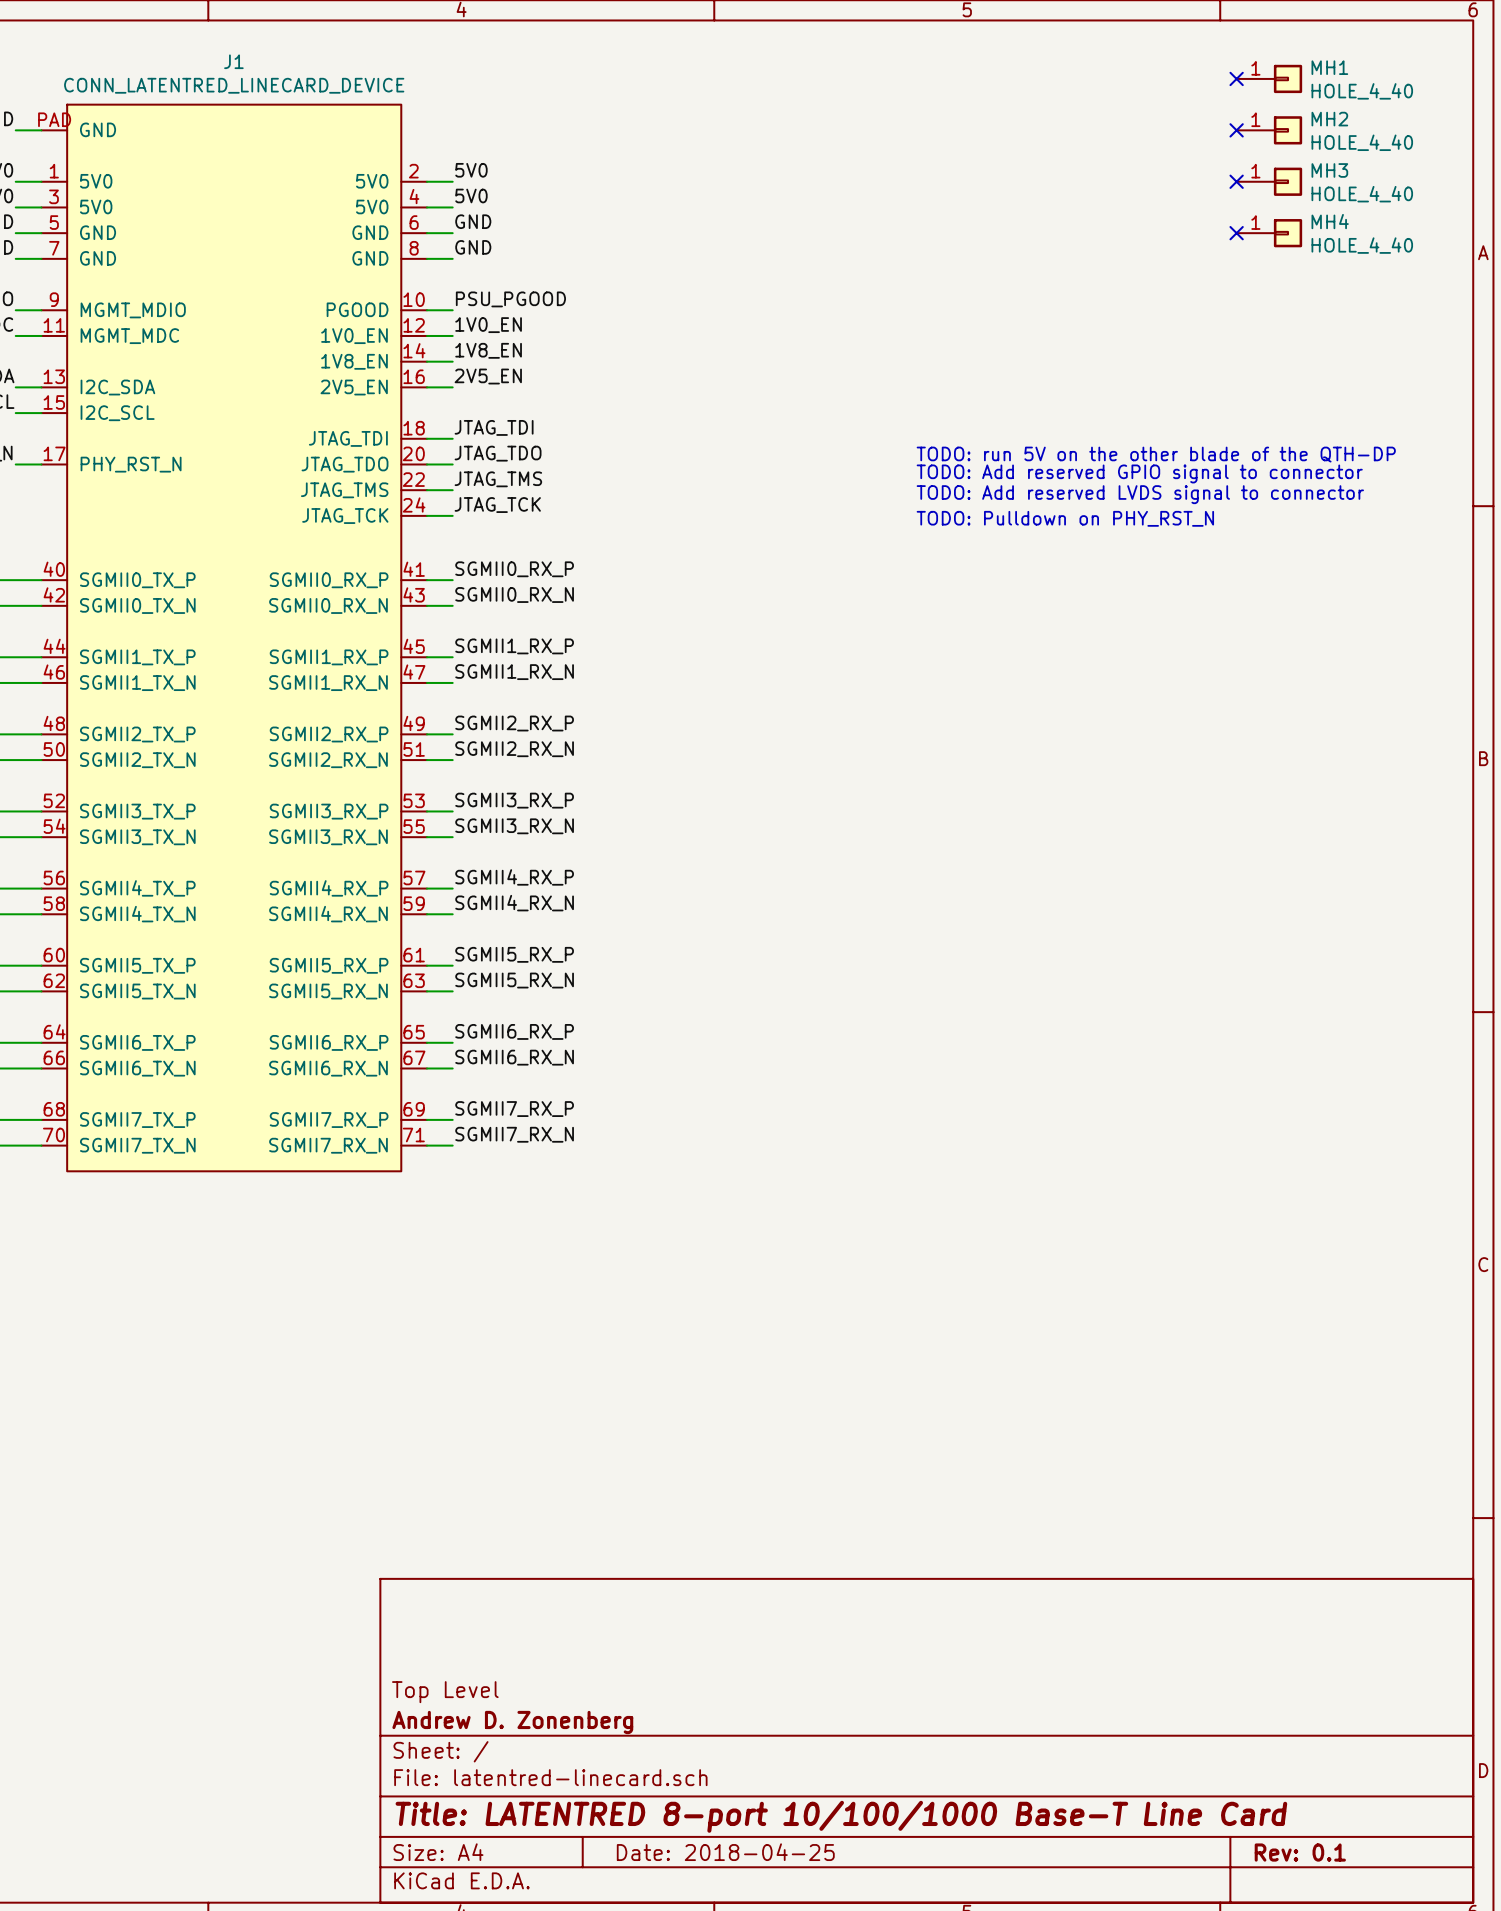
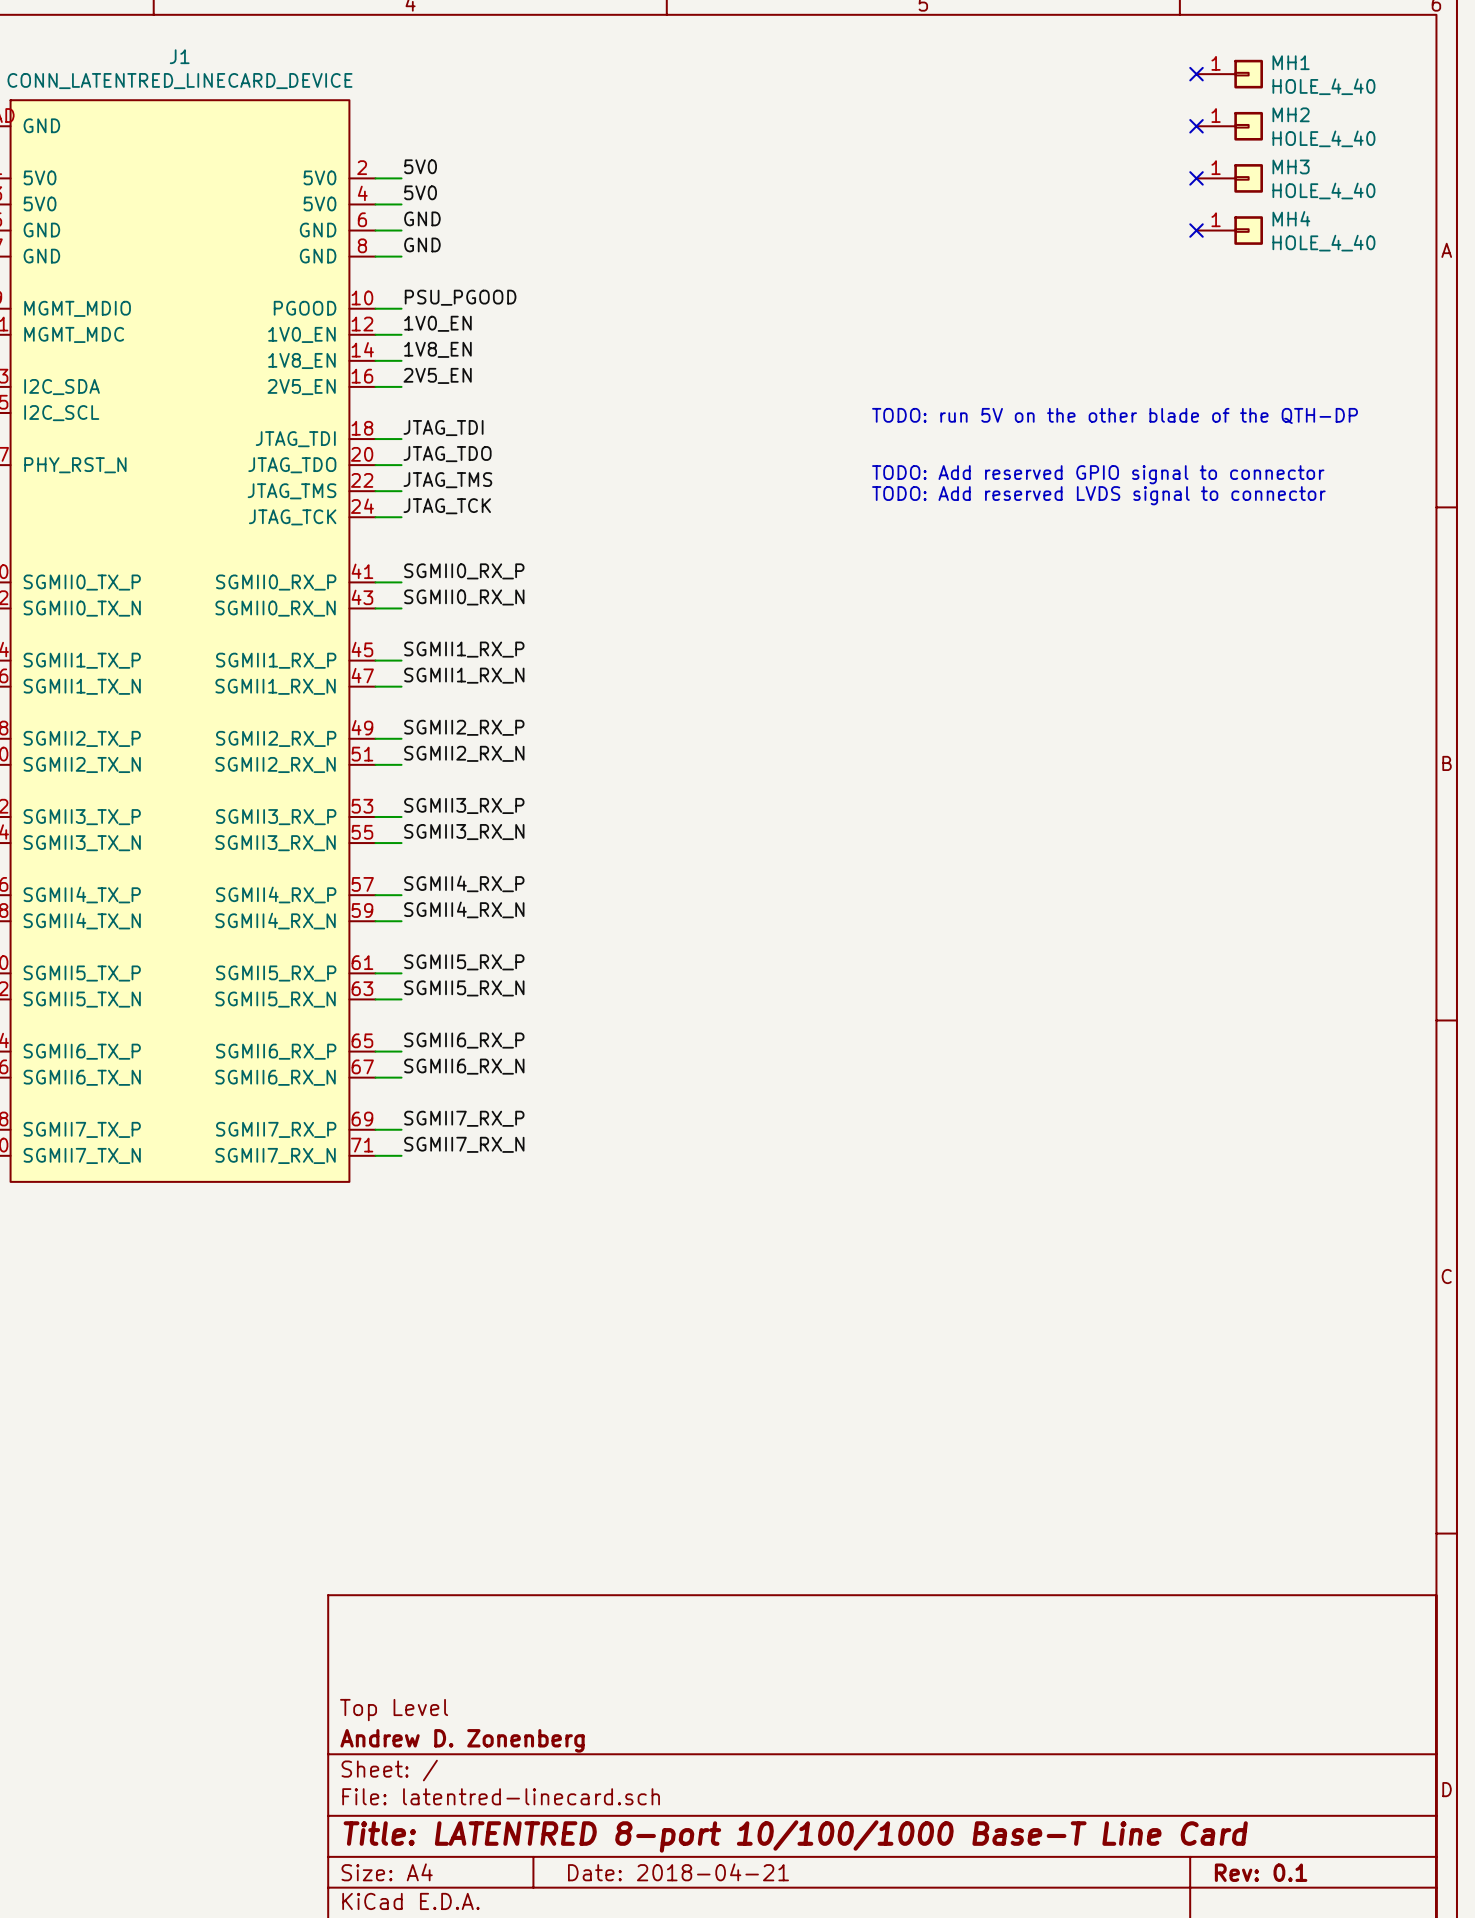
text position: TODO: run 5V on the other blade of the QTH-DP (1156, 454) -> TODO: run 5V on the other blade of the QTH-DP (1115, 415)
text: TODO: Pulldown on PHY_RST_N (1065, 518) -> none
title block: Date: 2018-04-25 (725, 1852) -> Date: 2018-04-21 (678, 1872)

